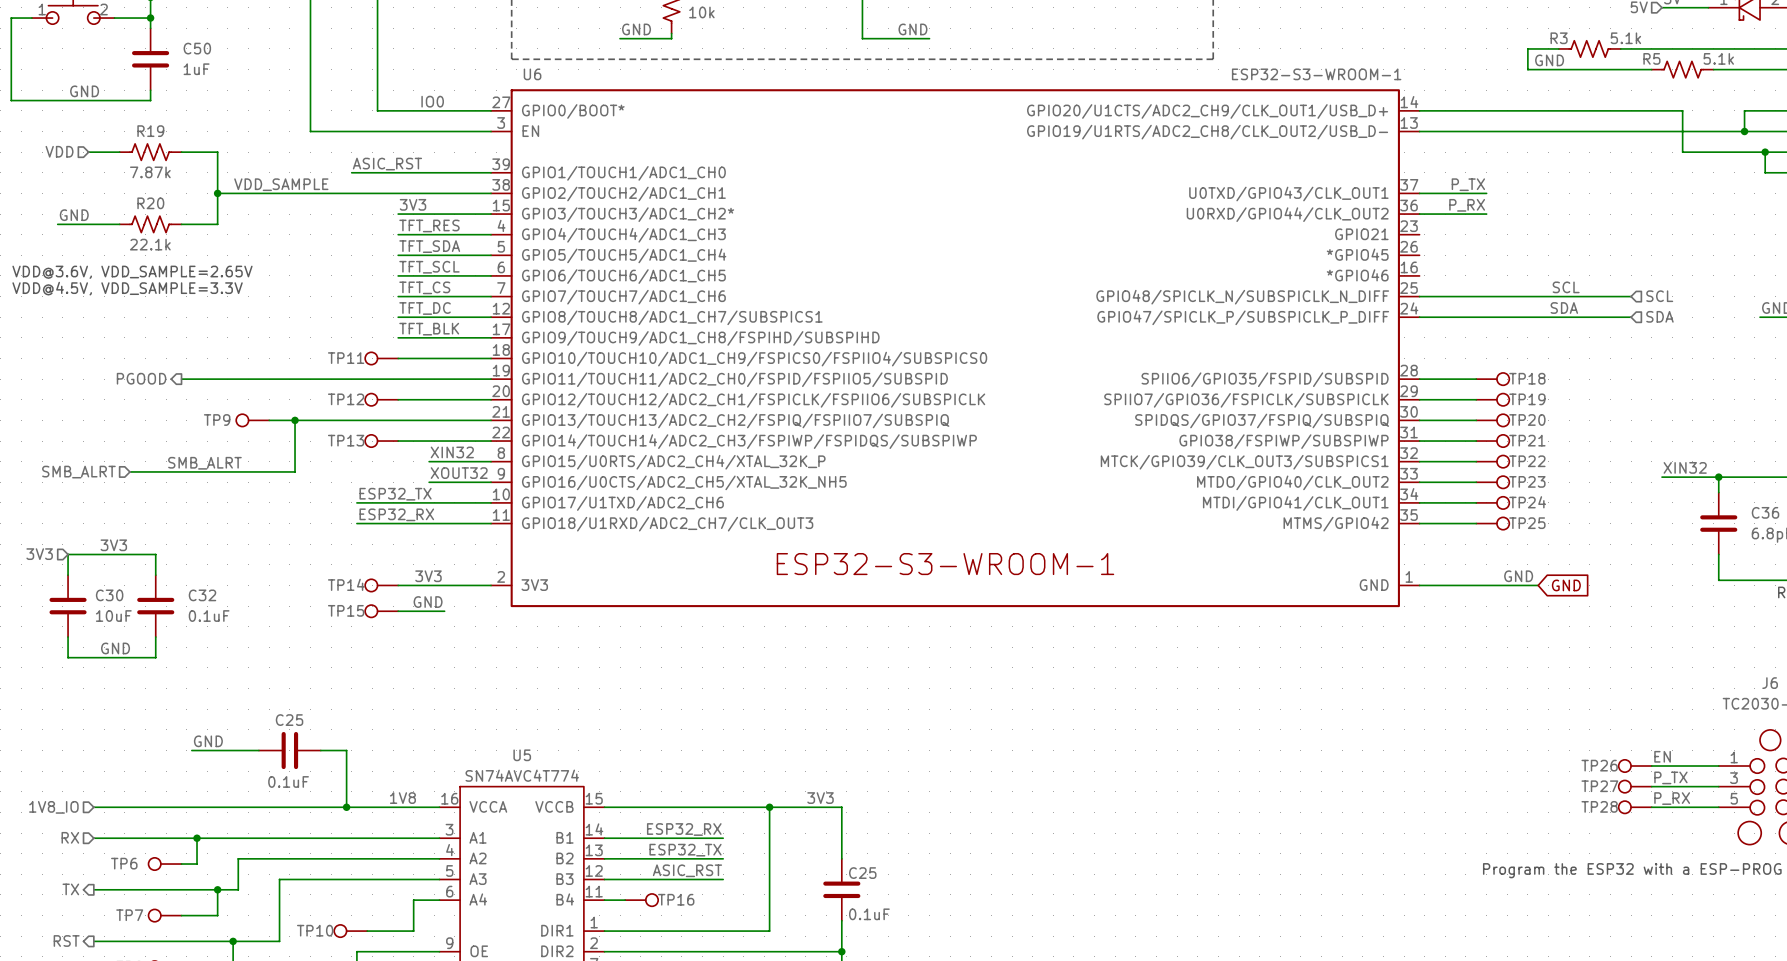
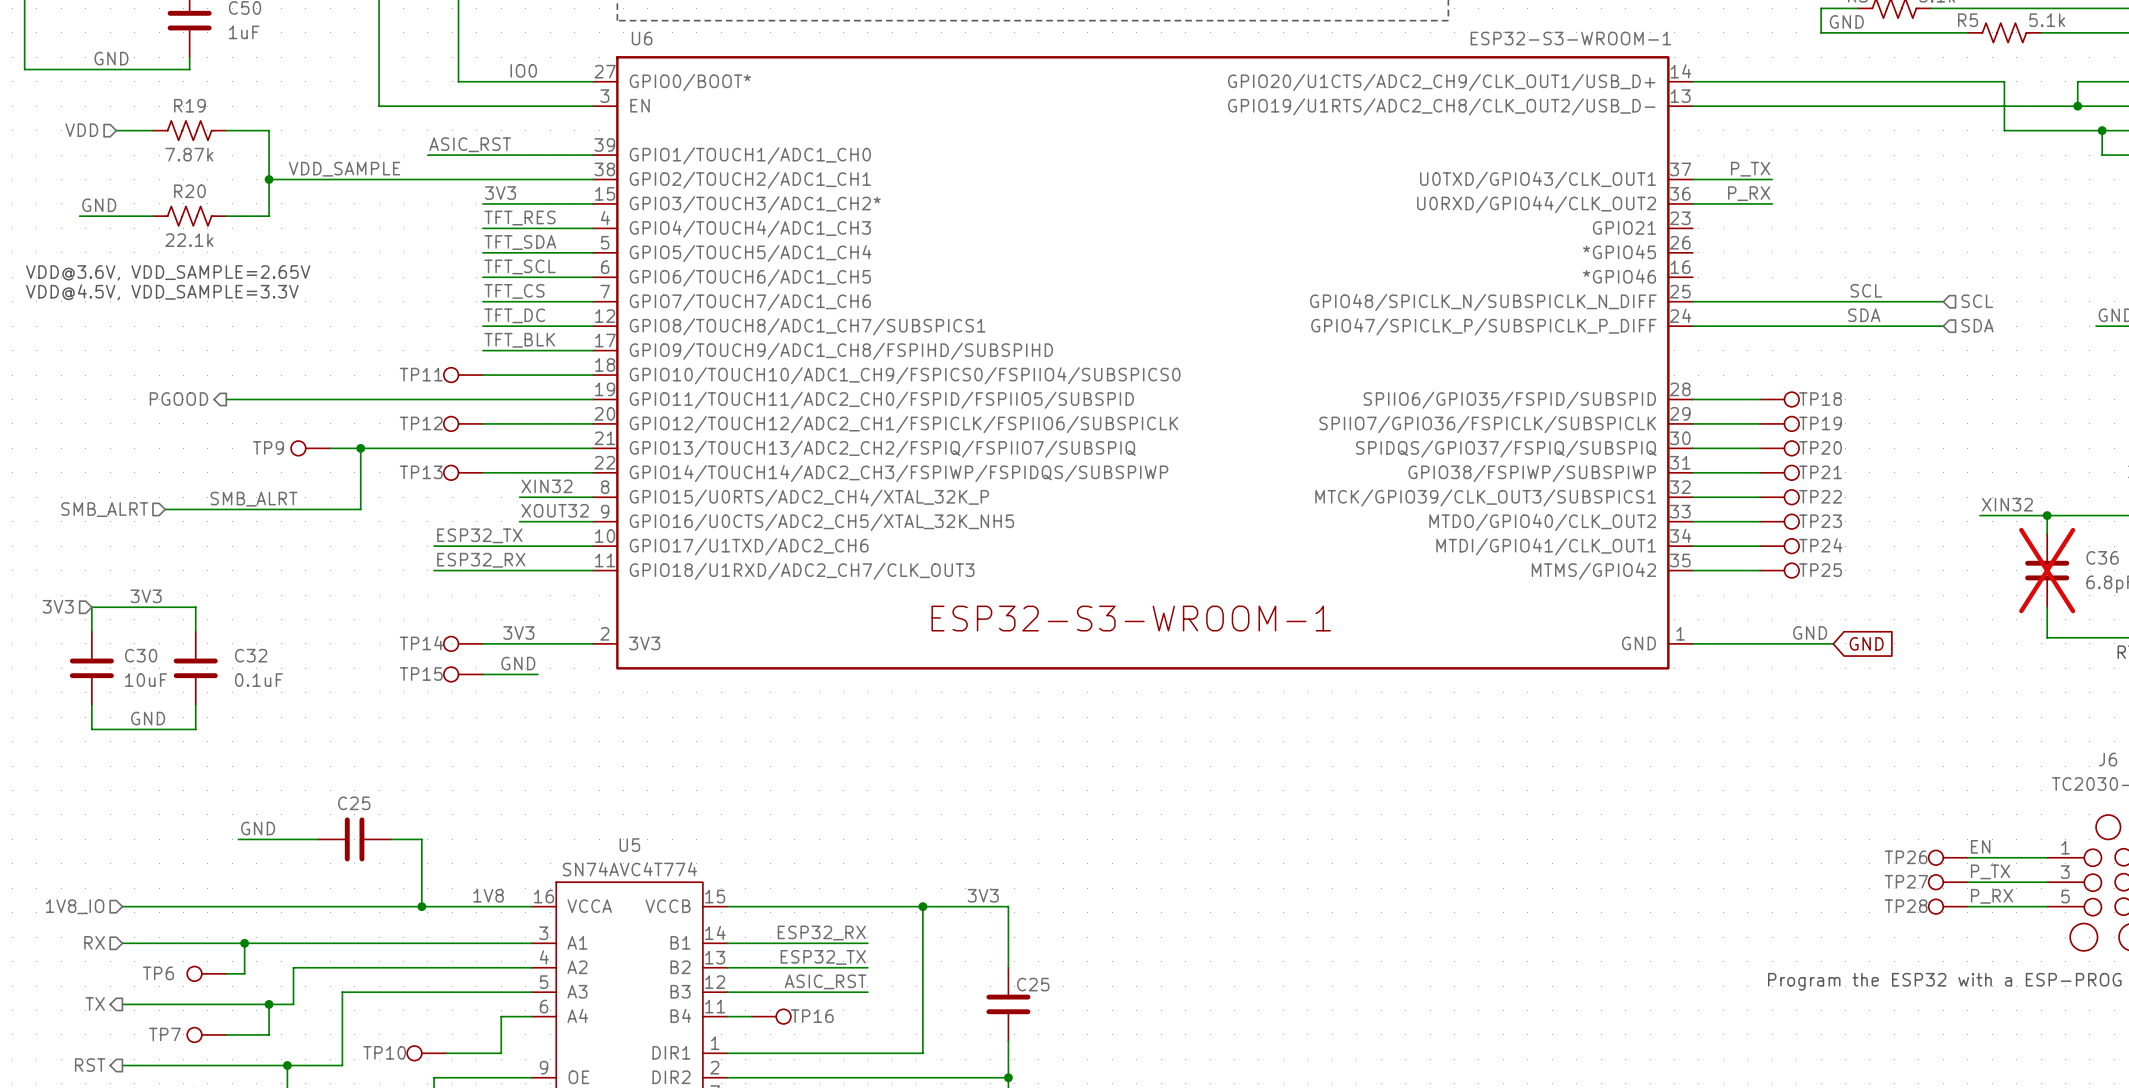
C36 do-not-place cross: none -> (2047, 570)
C25 value: 0.1uF (288, 781) -> none
C25 value: 0.1uF (869, 914) -> none

